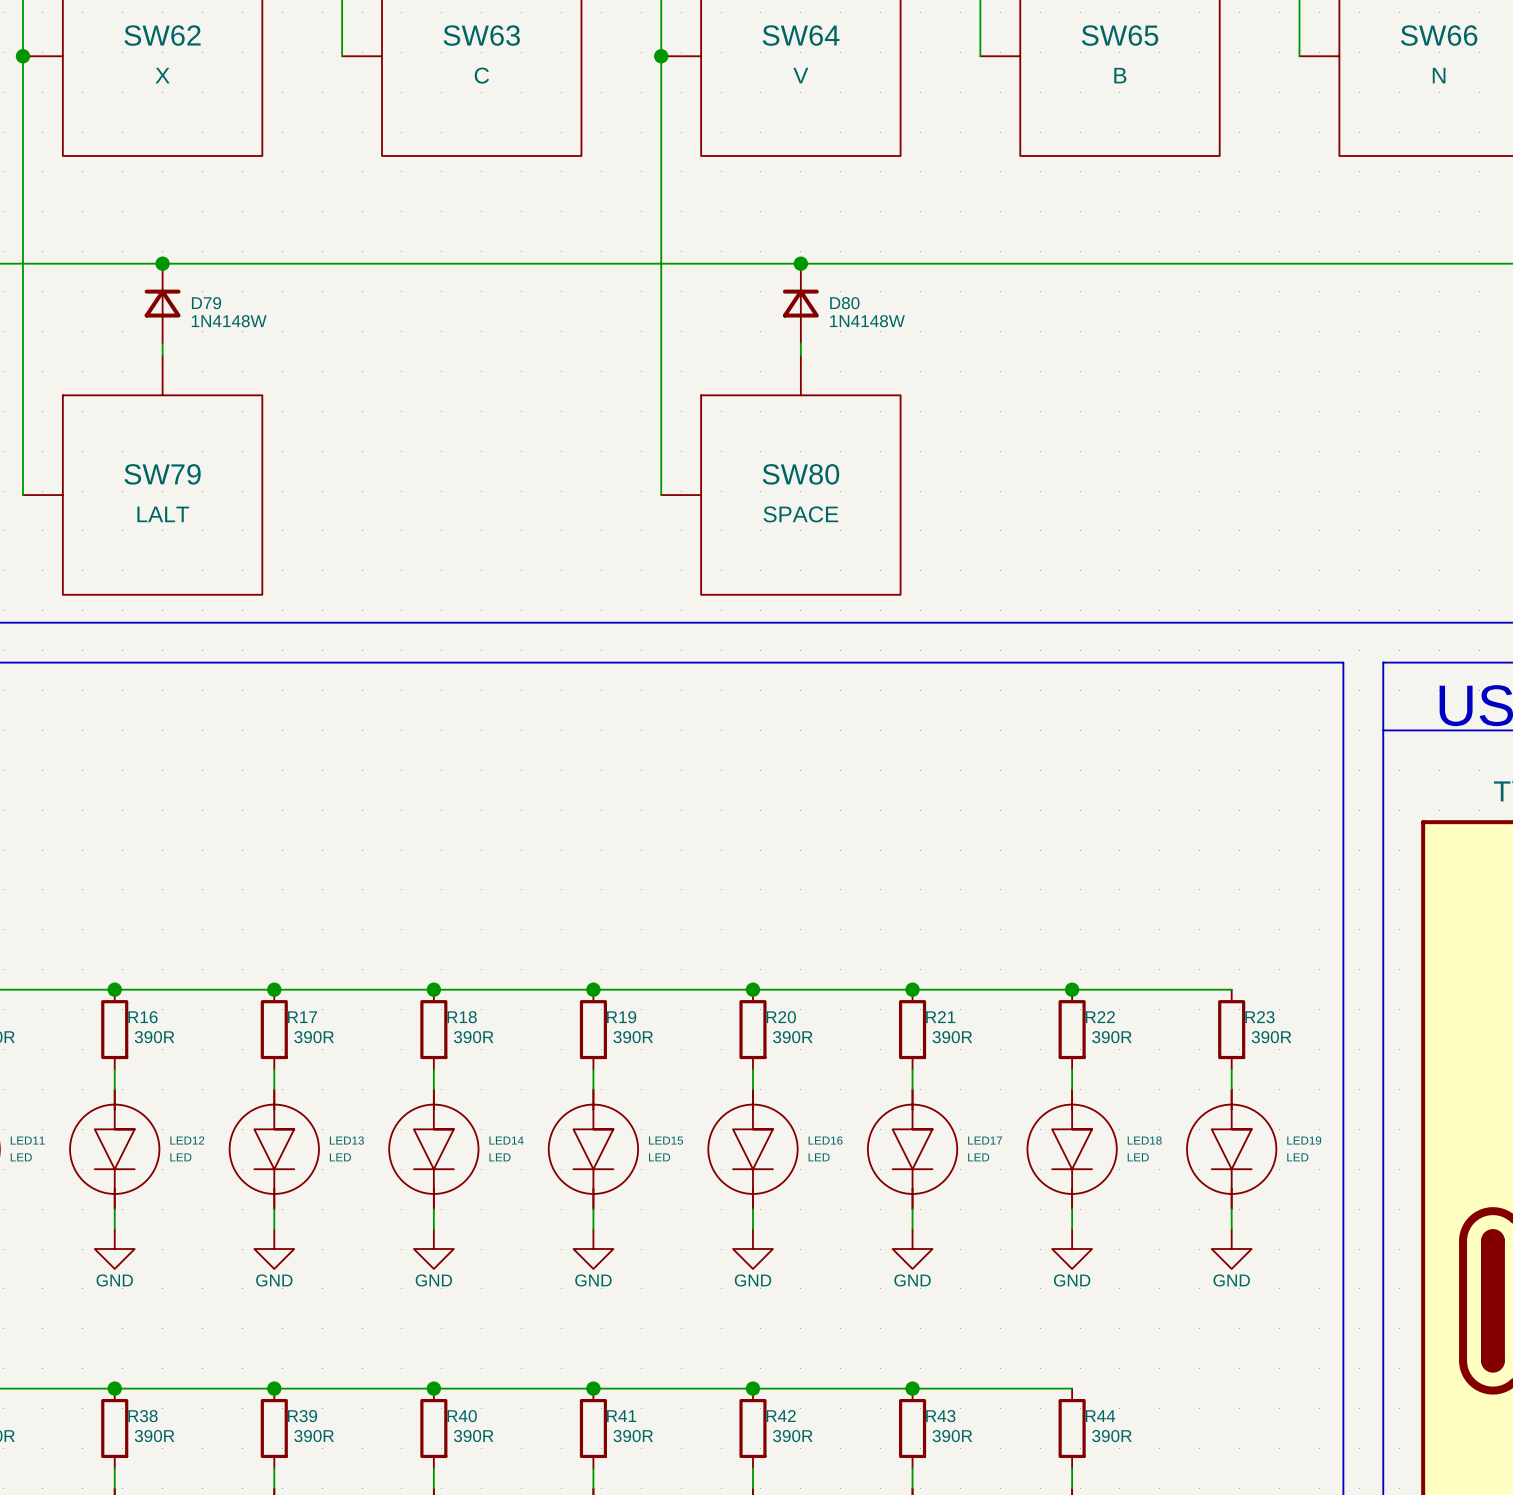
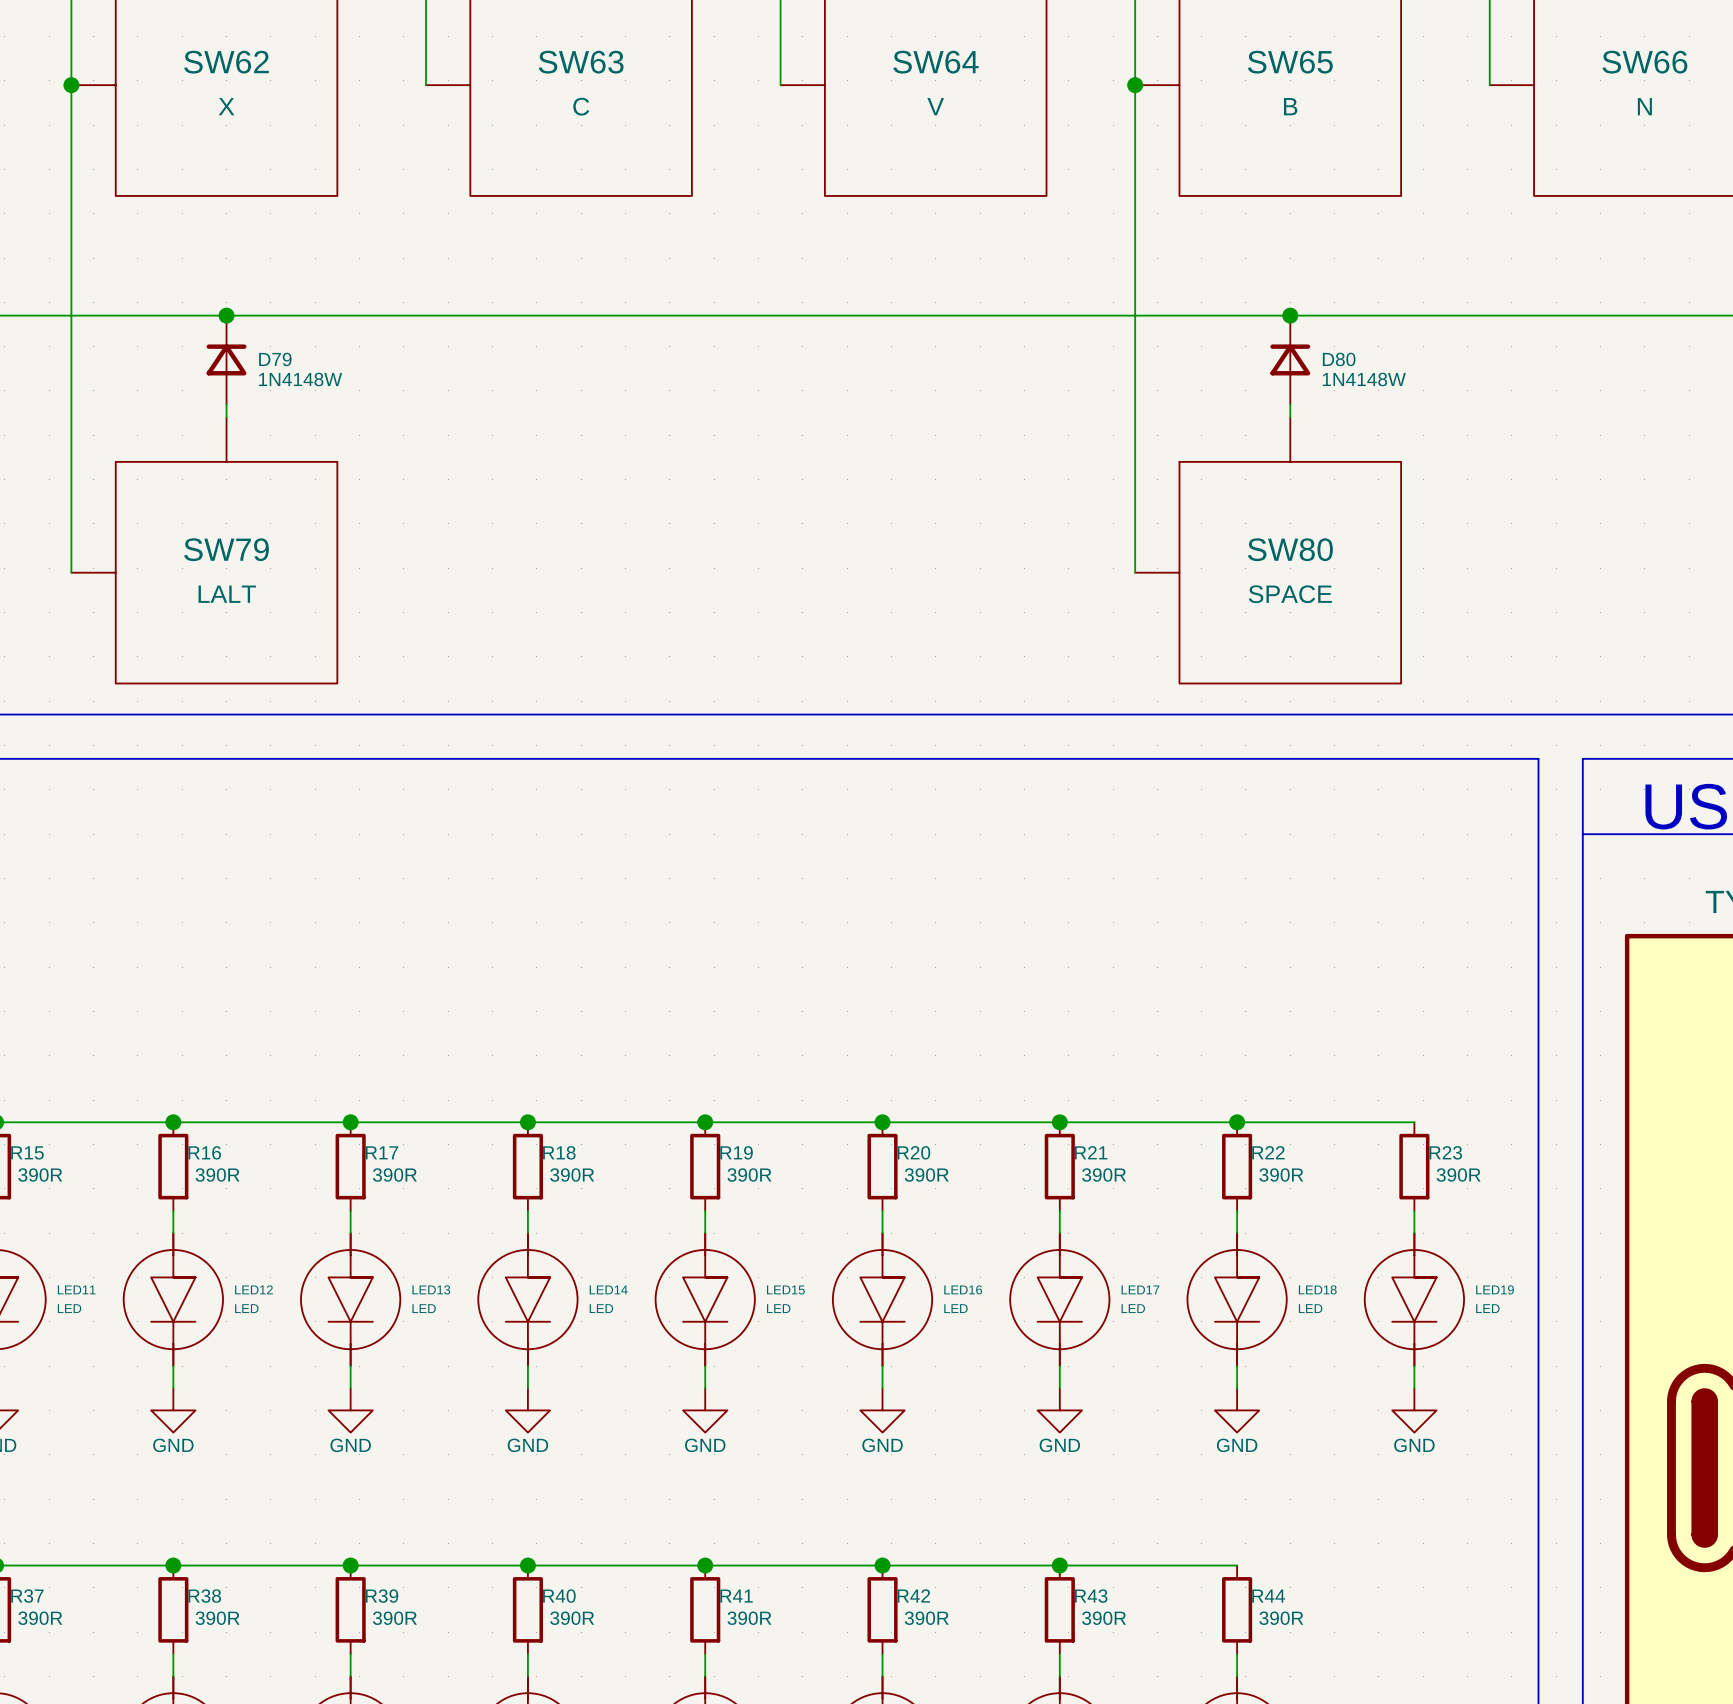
wire: (661, 56) (661, 495) -> (1135, 85) (1135, 572)
junction: (661, 56) -> none
junction: none -> (1135, 85)
junction: (800, 263) -> none
junction: none -> (1290, 315)
D80 position: (800, 303) -> (1290, 359)
wire: (800, 343) (800, 355) -> (1290, 404) (1290, 417)
SW80 position: (780, 475) -> (1268, 550)

